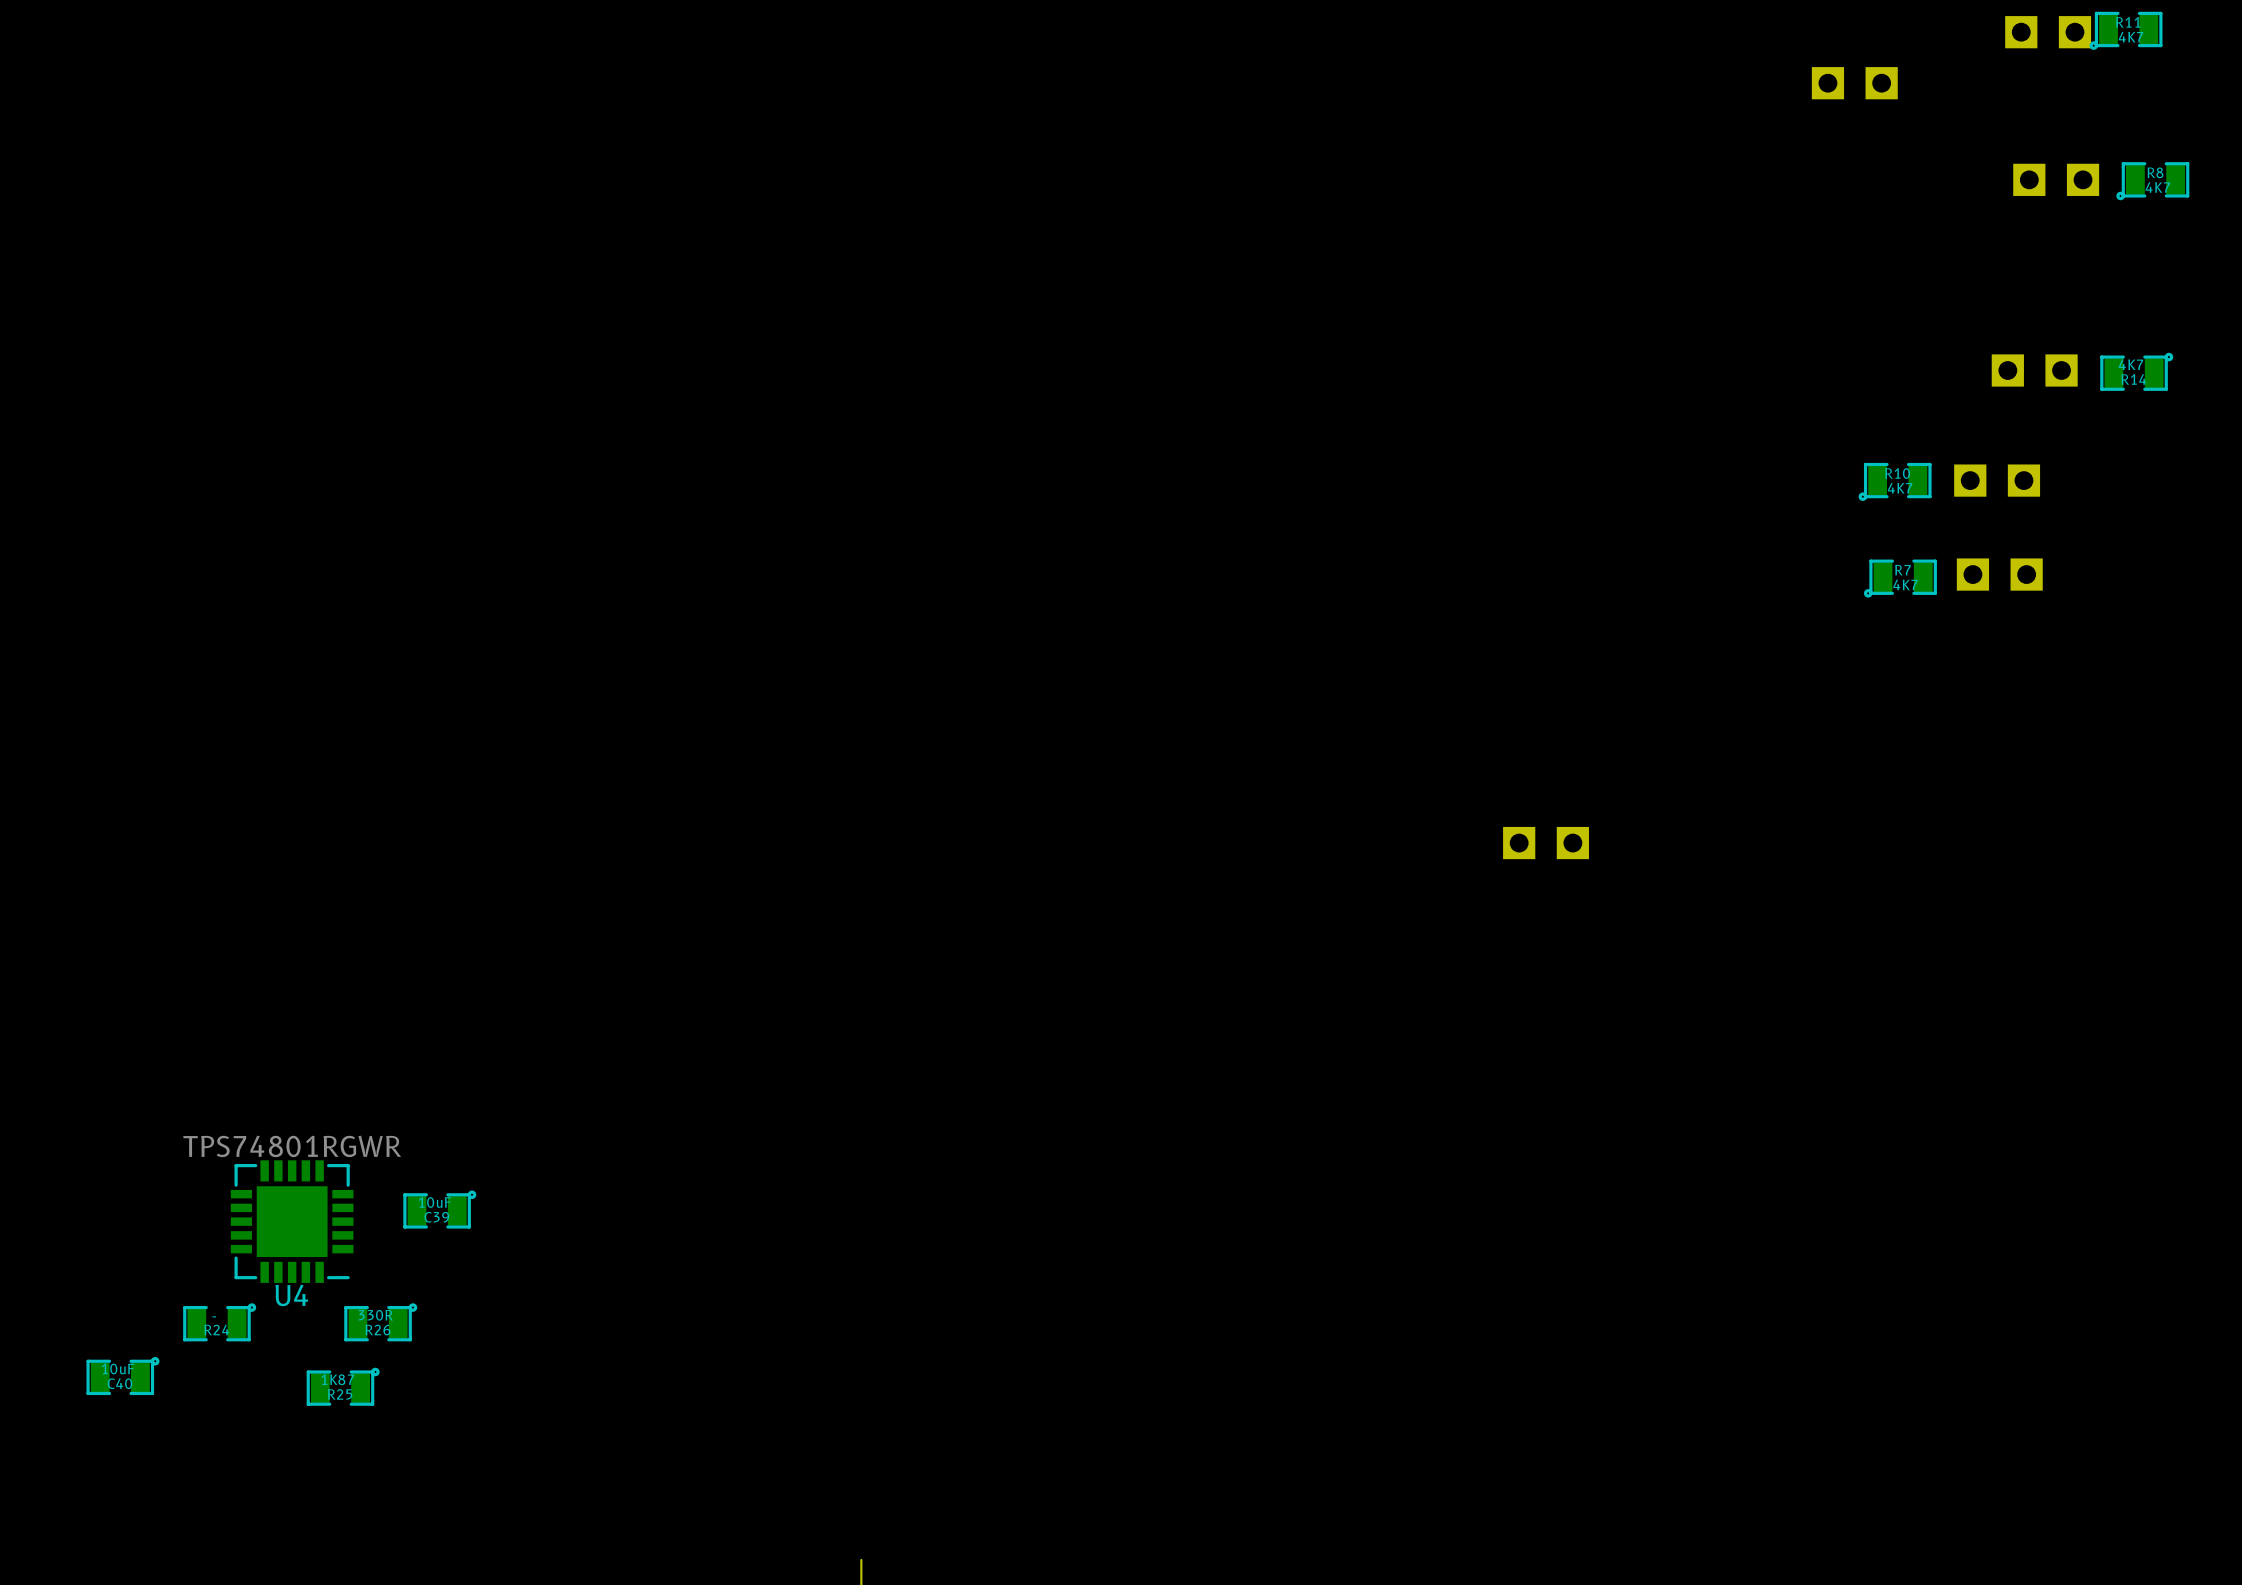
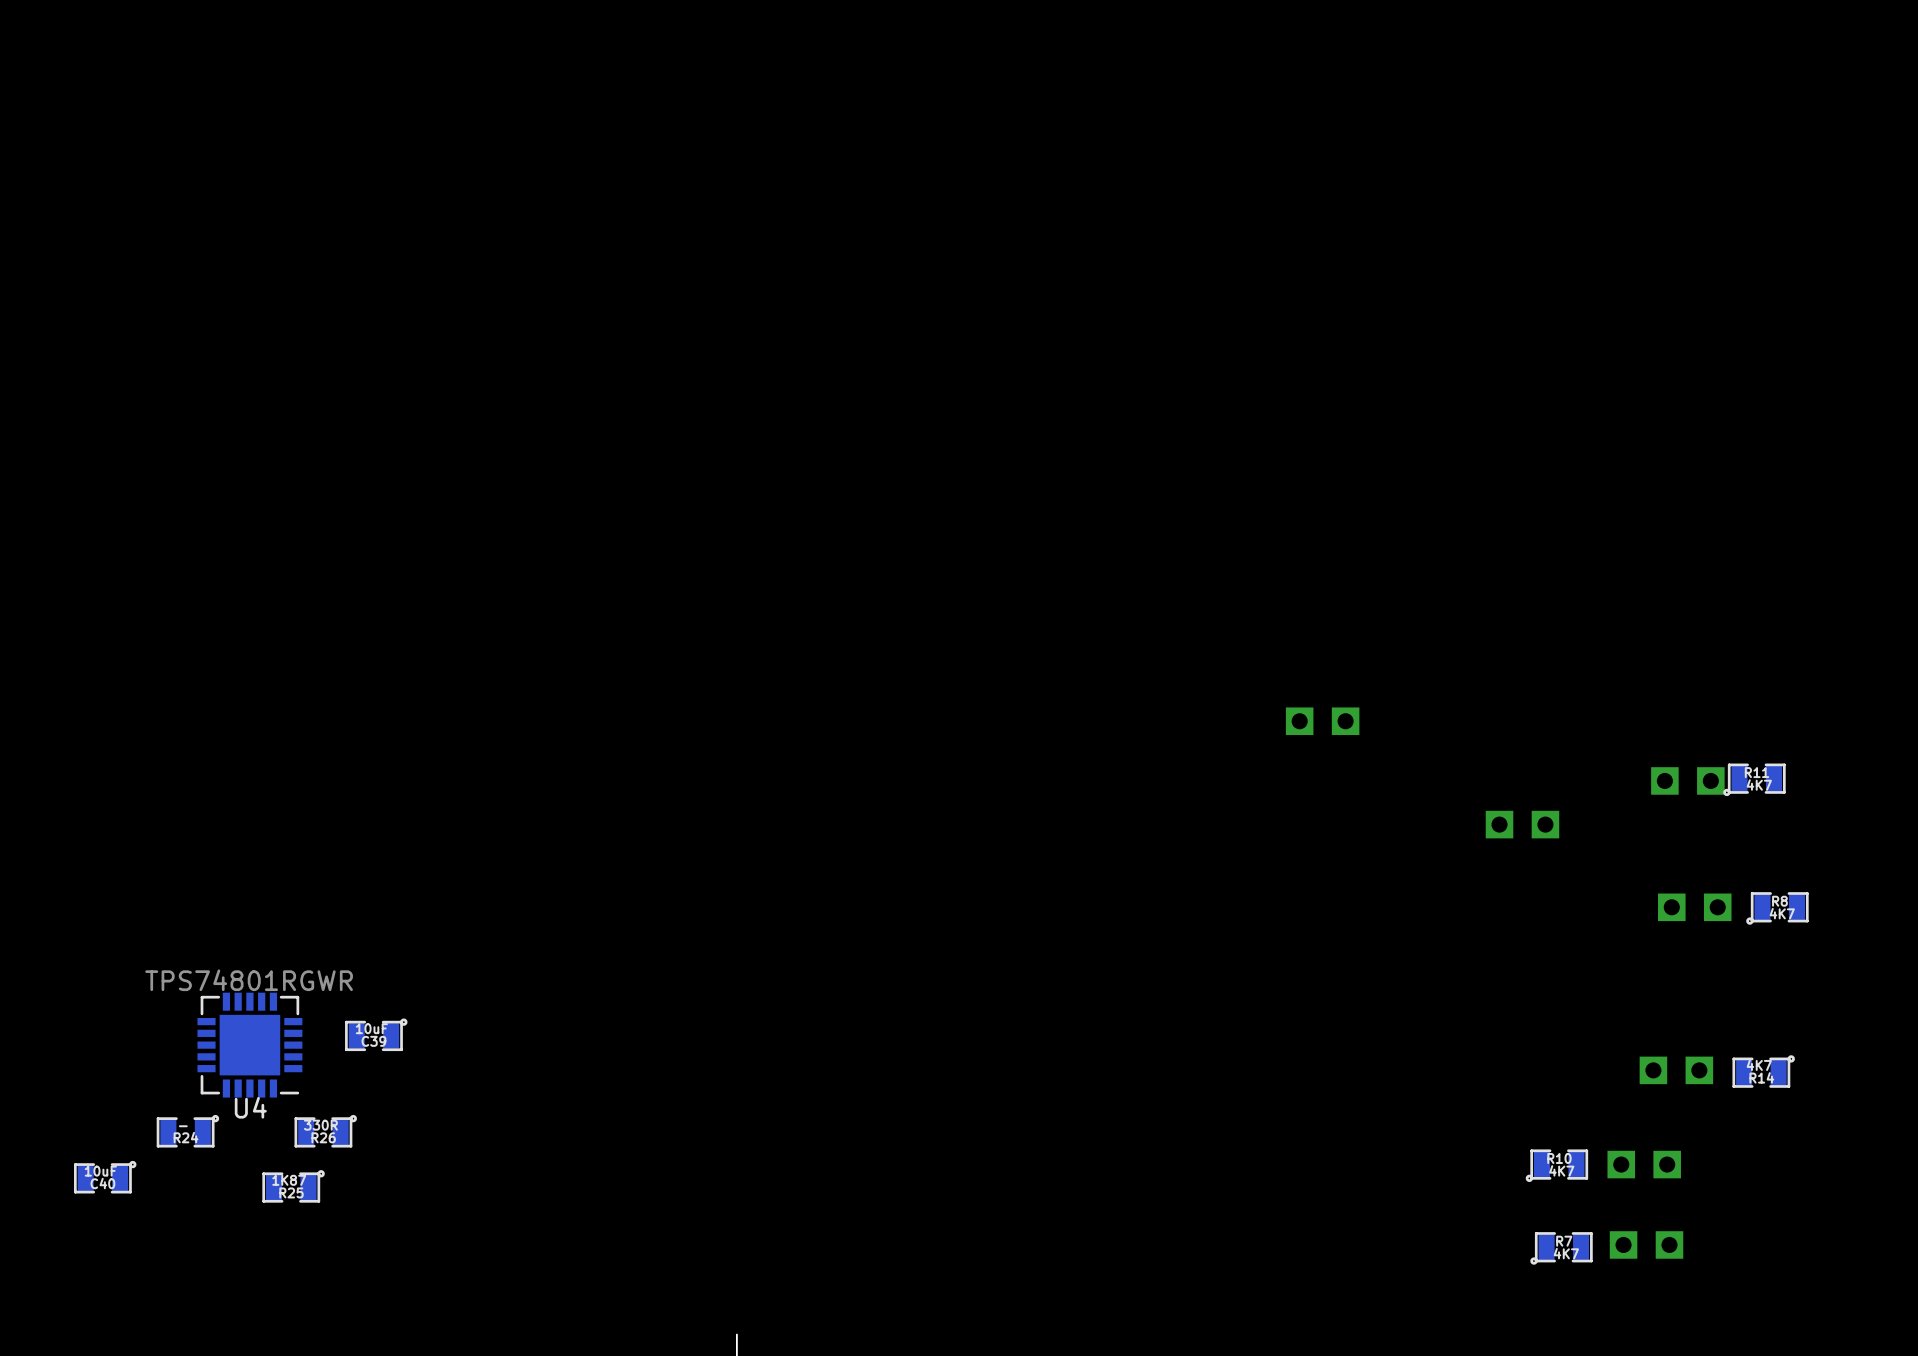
R11 position: (2125, 30) -> (1754, 779)
part: (2048, 32) -> none
part: (1854, 83) -> none
part: (2056, 179) -> none
R8 position: (2152, 181) -> (1777, 908)
part: (2034, 370) -> none
R14 position: (2136, 371) -> (1763, 1071)
part: (1997, 480) -> none
R10 position: (1895, 481) -> (1556, 1165)
part: (1999, 574) -> none
R7 position: (1900, 578) -> (1561, 1248)
part: none -> (1687, 780)
part: none -> (1522, 824)
part: none -> (1694, 907)
part: none -> (1676, 1070)
part: none -> (1644, 1164)
part: none -> (1646, 1244)

